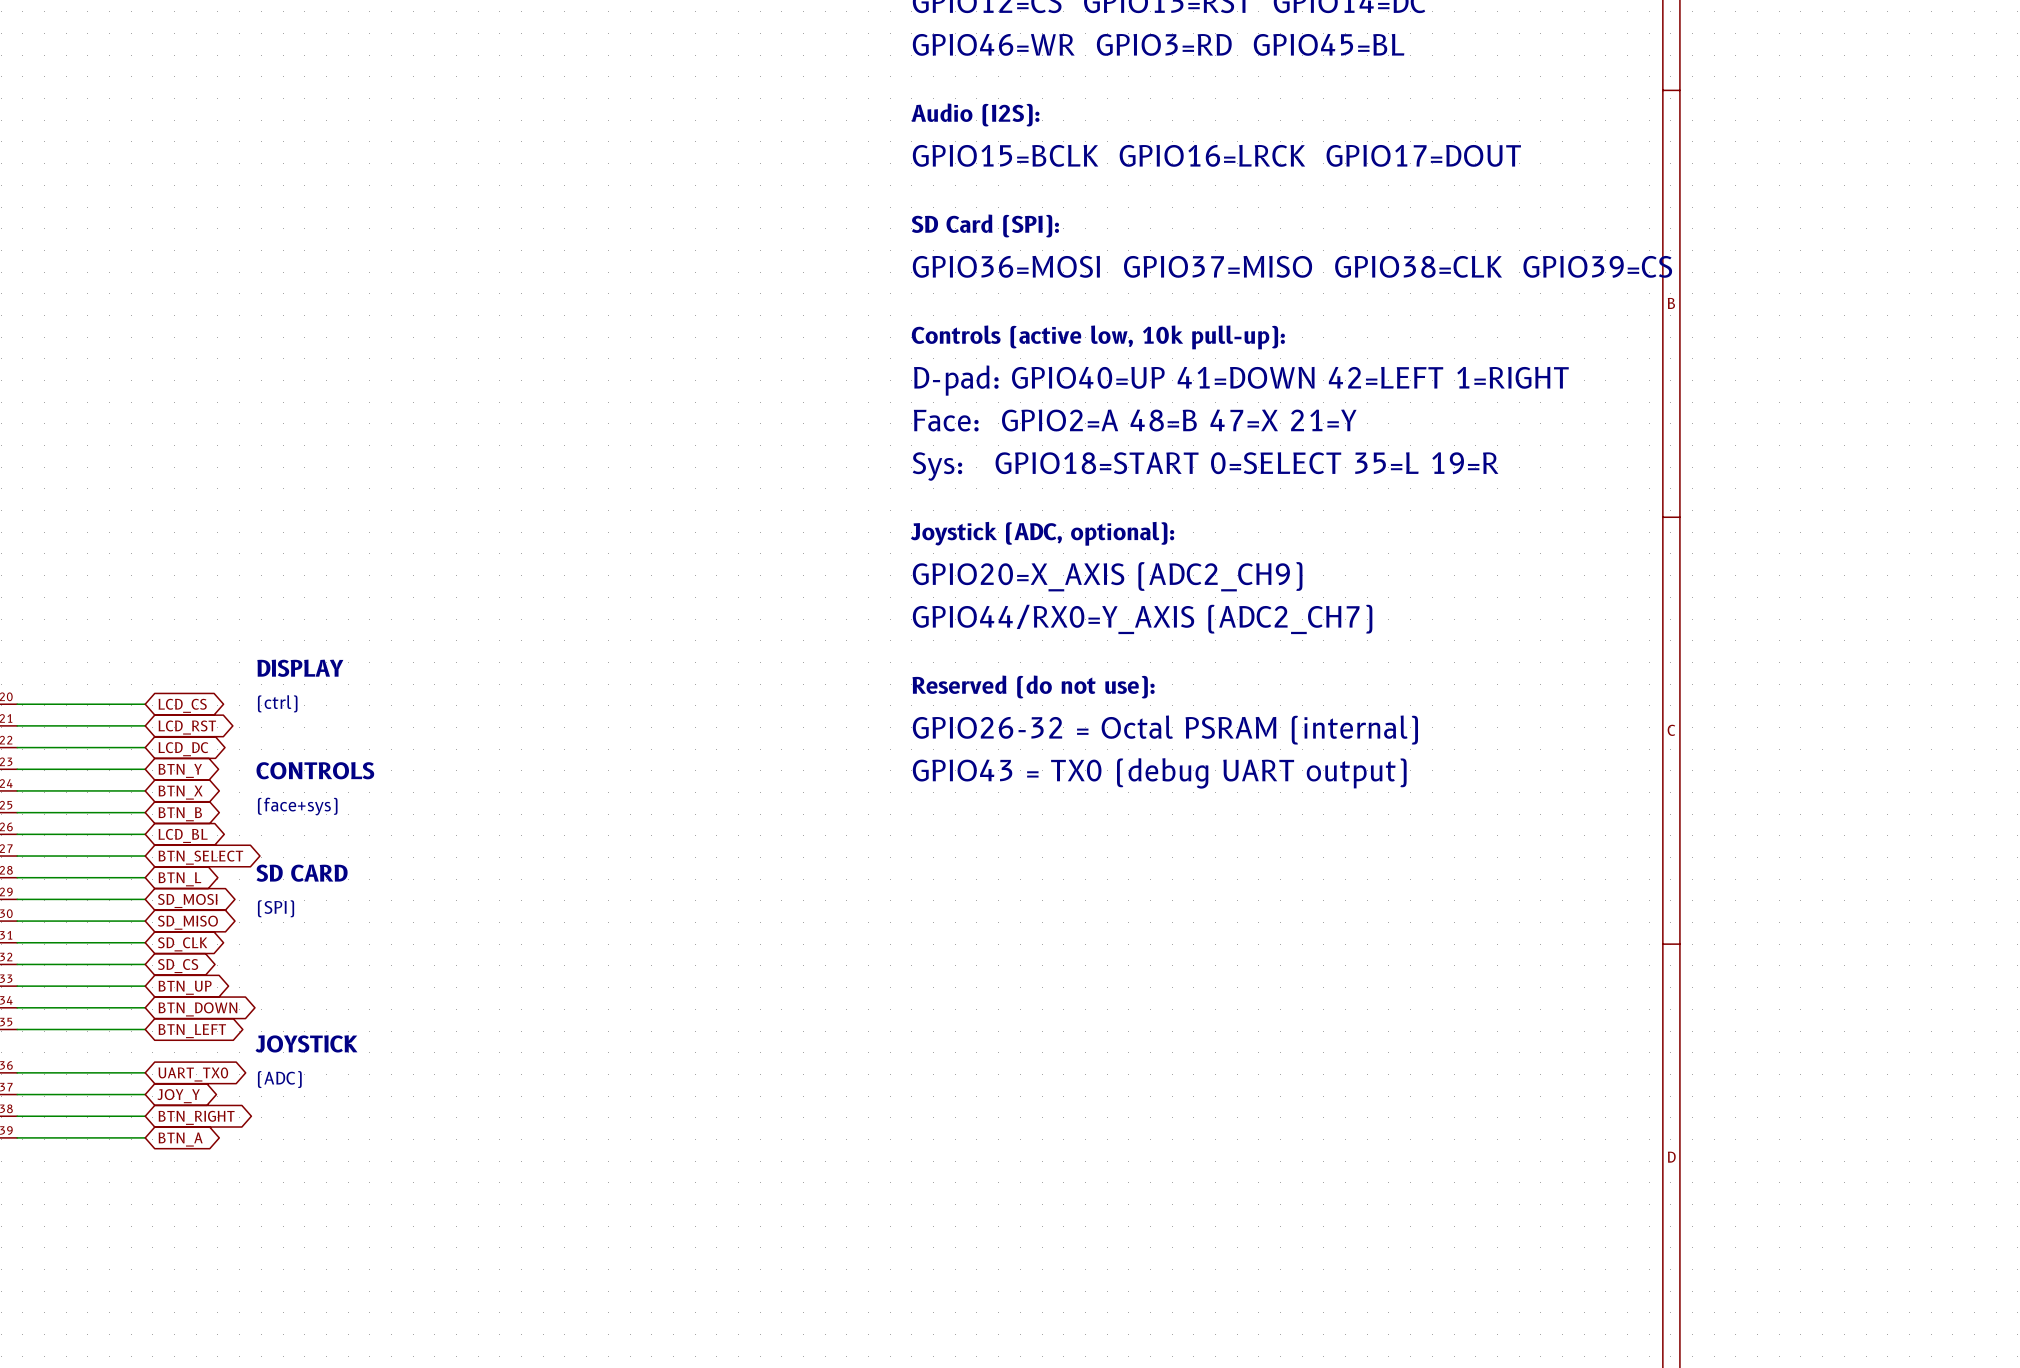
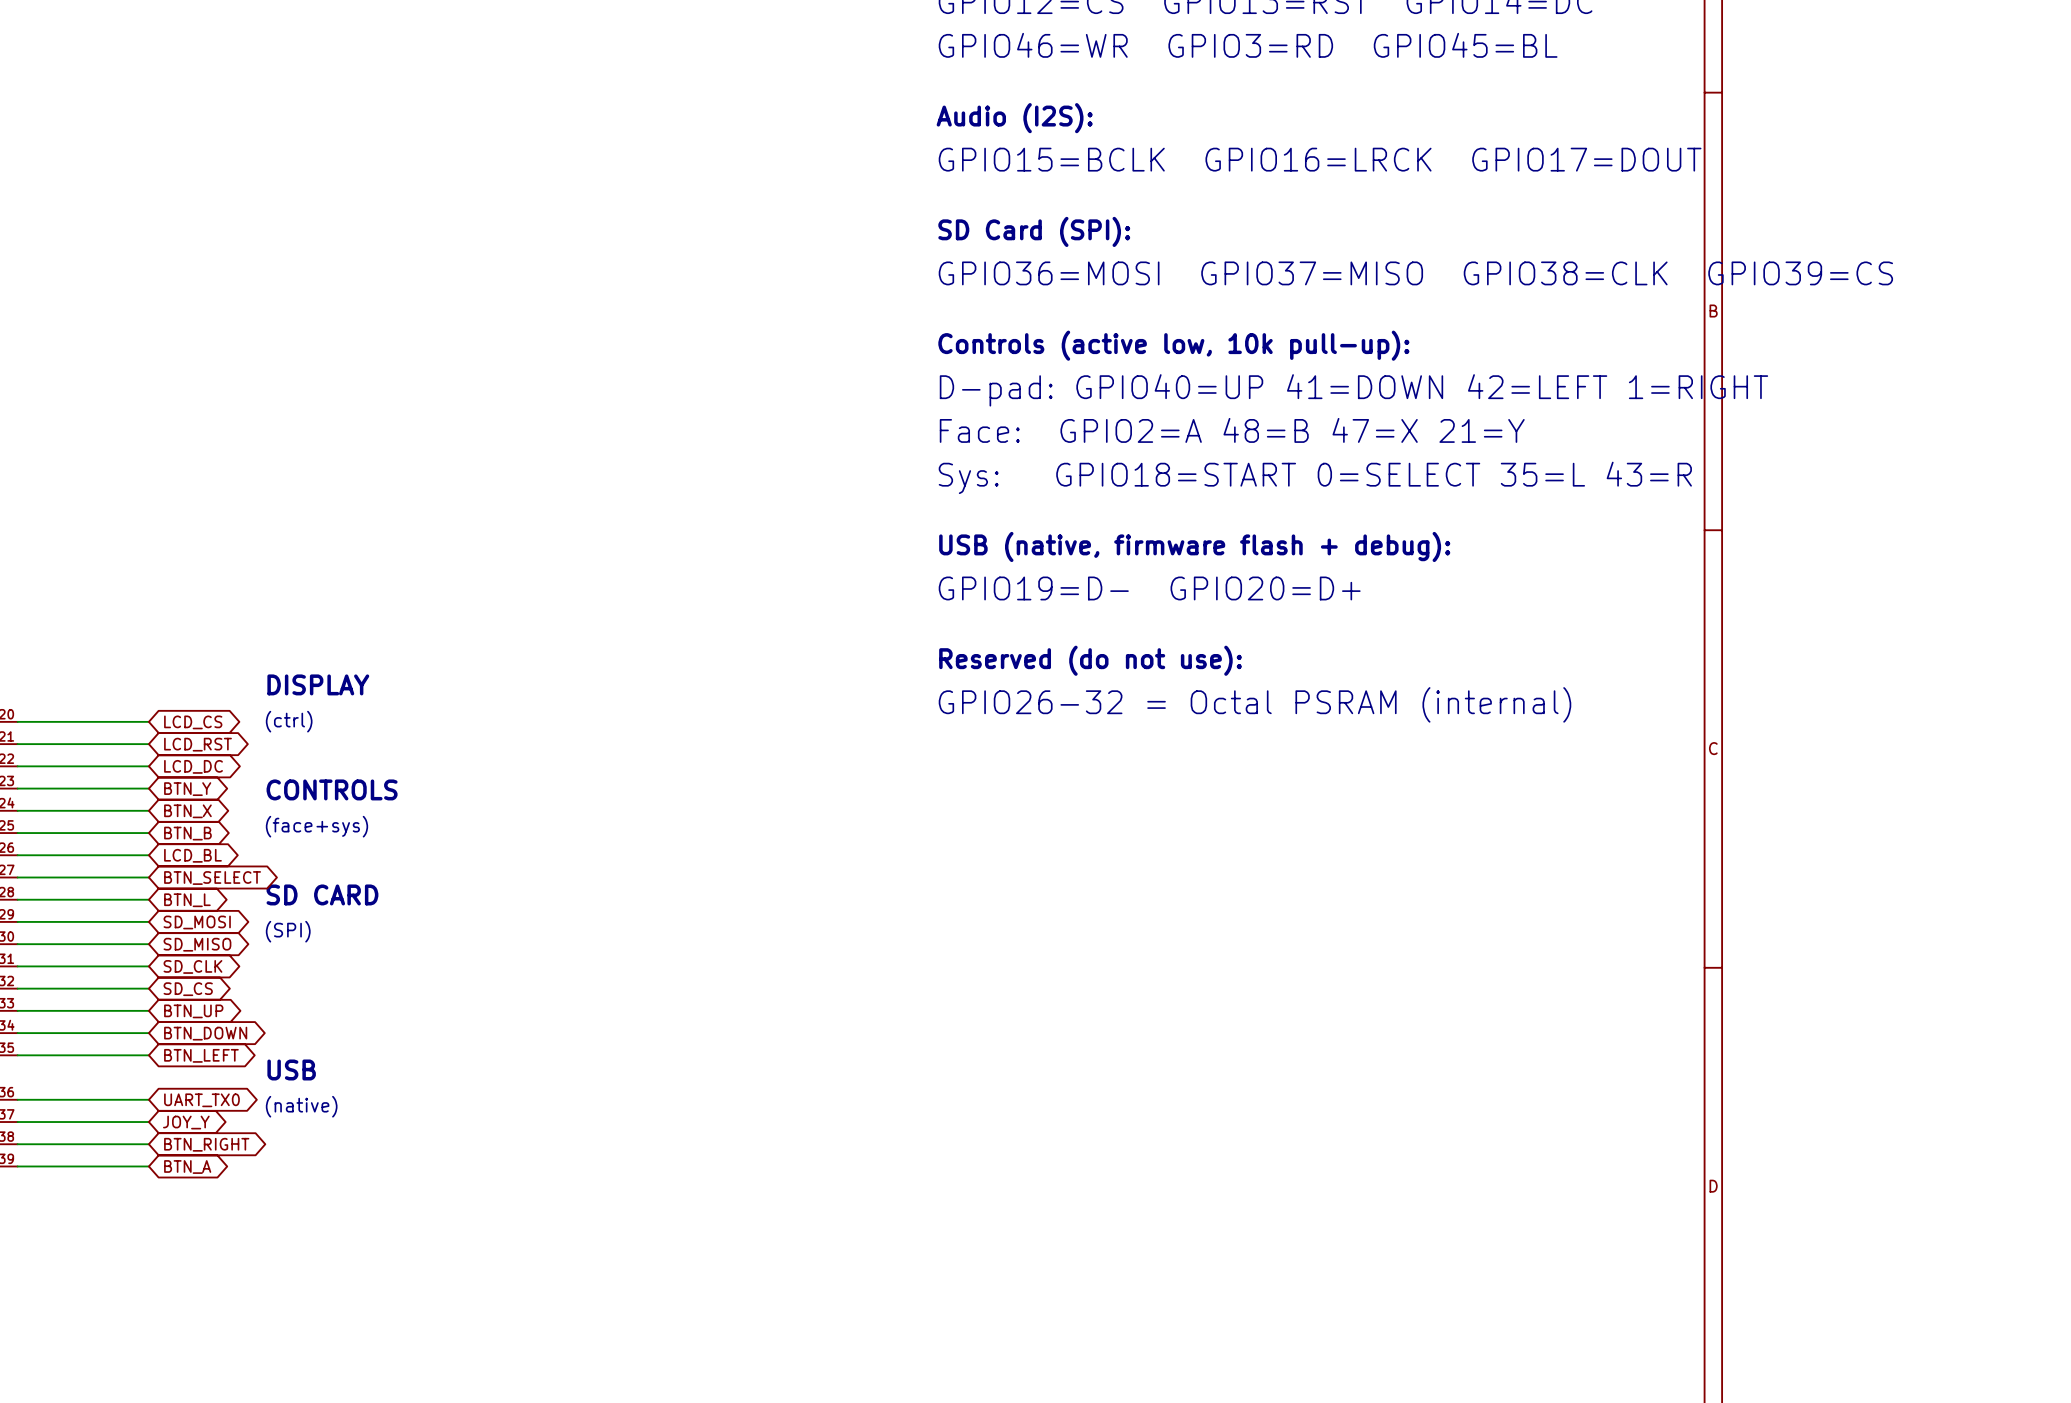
text: Sys: GPIO18=START 0=SELECT 35=L 19=R (1205, 466) -> Sys: GPIO18=START 0=SELECT 35=L 43=R (1315, 477)
text: Joystick (ADC, optional): (1042, 533) -> USB (native, firmware flash + debug): (1194, 546)
text: GPIO20=X_AXIS (ADC2_CH9) (1107, 576) -> GPIO19=D- GPIO20=D+ (1149, 588)
text: GPIO44/RX0=Y_AXIS (ADC2_CH7) (1142, 619) -> none
text: none -> Reserved (do not use): (1090, 660)
text: Reserved (do not use): (1033, 686) -> GPIO26-32 = Octal PSRAM (internal) (1254, 704)
text: GPIO26-32 = Octal PSRAM (internal) (1165, 730) -> none
text: GPIO43 = TX0 (debug UART output) (1159, 773) -> none
text: JOYSTICK (306, 1043) -> USB (291, 1069)
text: (ADC) (279, 1079) -> (native) (301, 1106)

